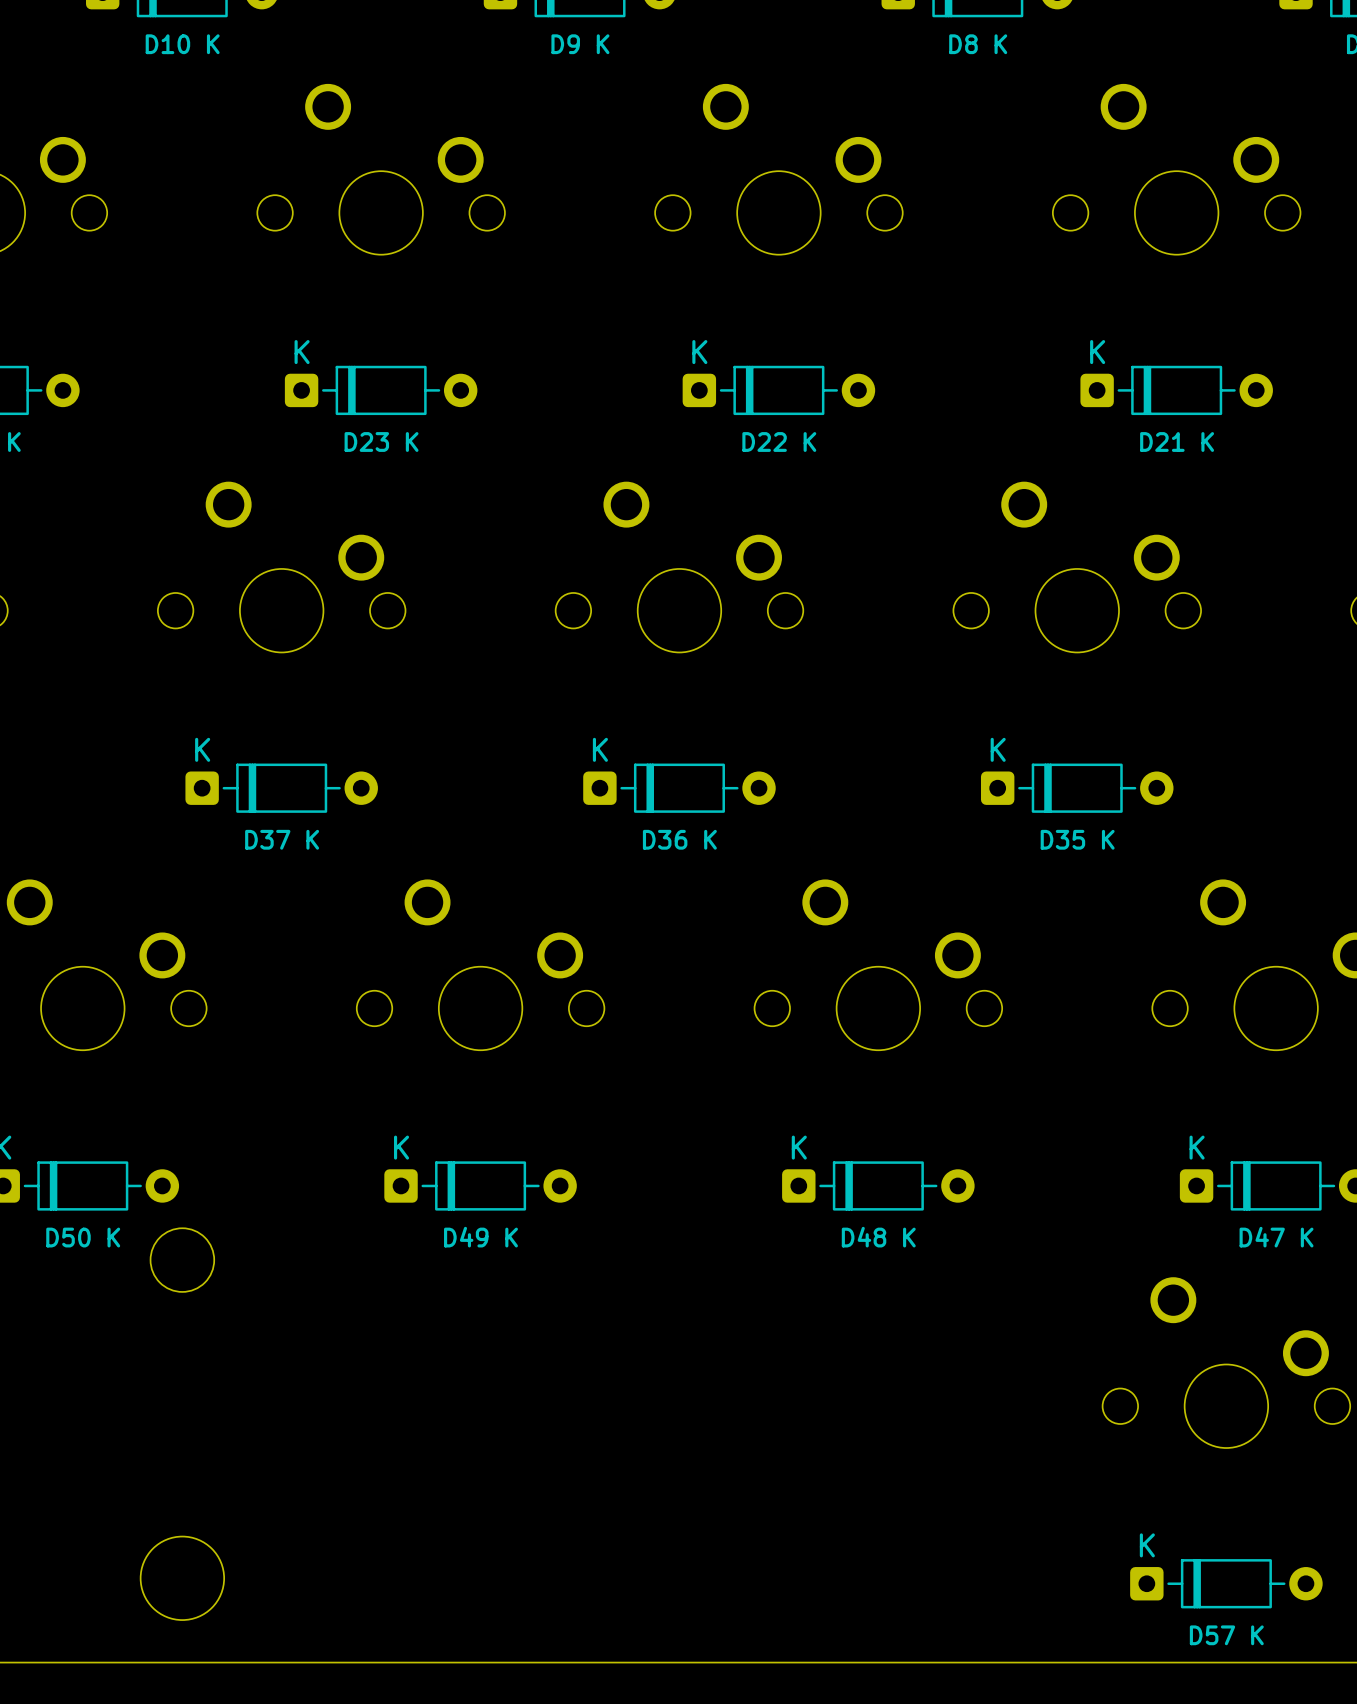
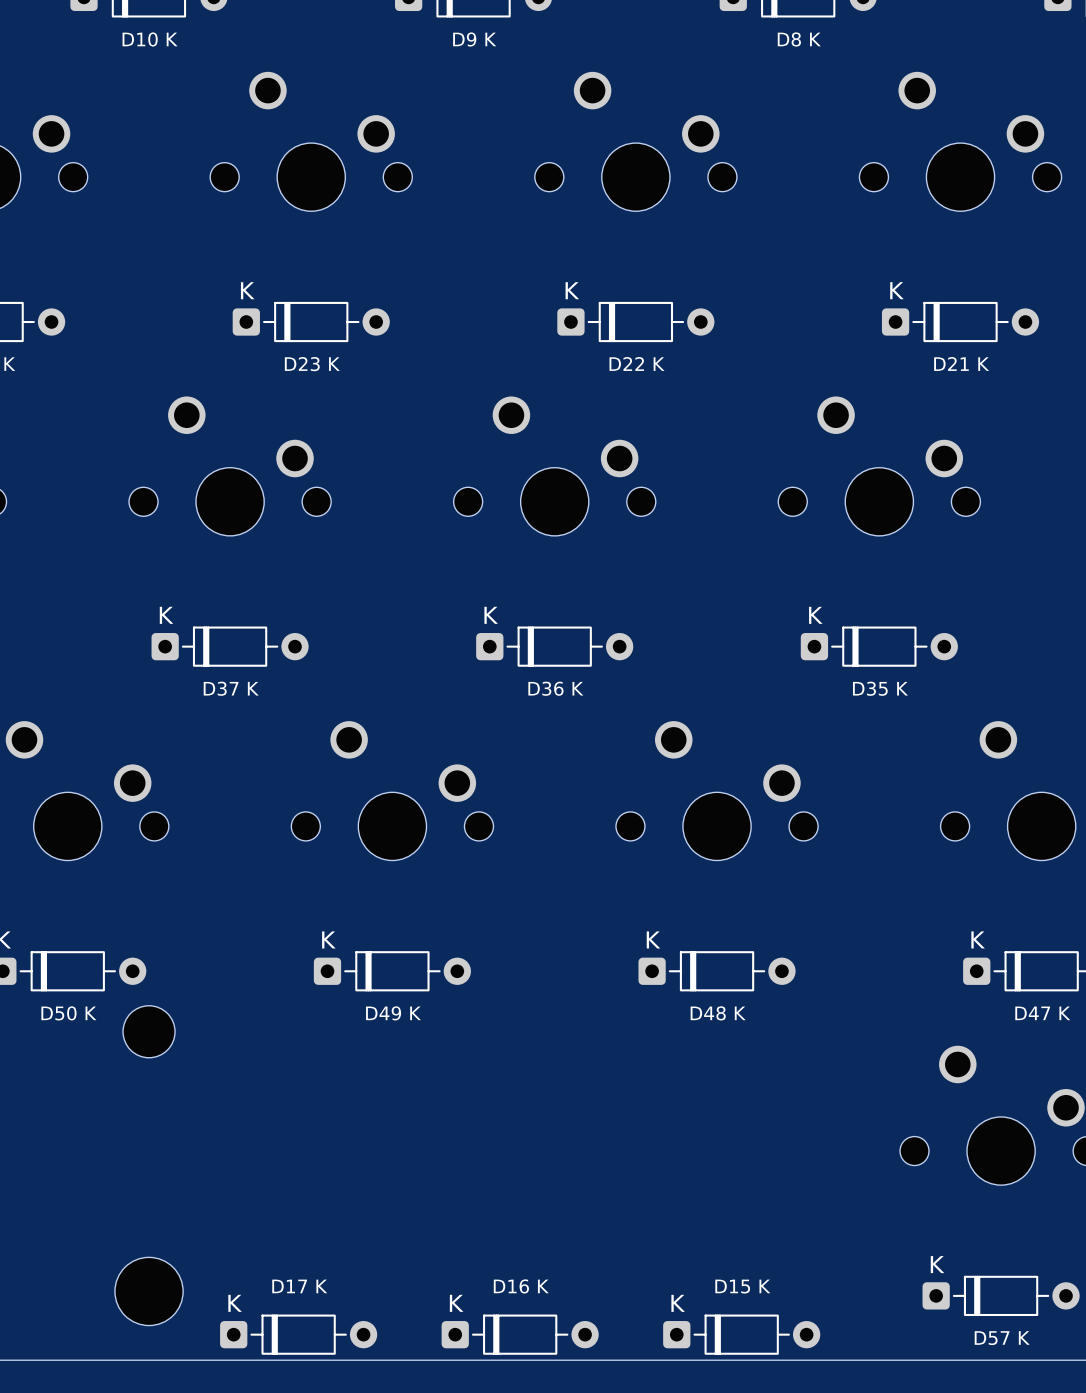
text: none -> D17 K (299, 1286)
text: none -> D16 K (521, 1286)
text: none -> D15 K (742, 1286)
part: none -> (298, 1334)
part: none -> (520, 1334)
part: none -> (741, 1334)

